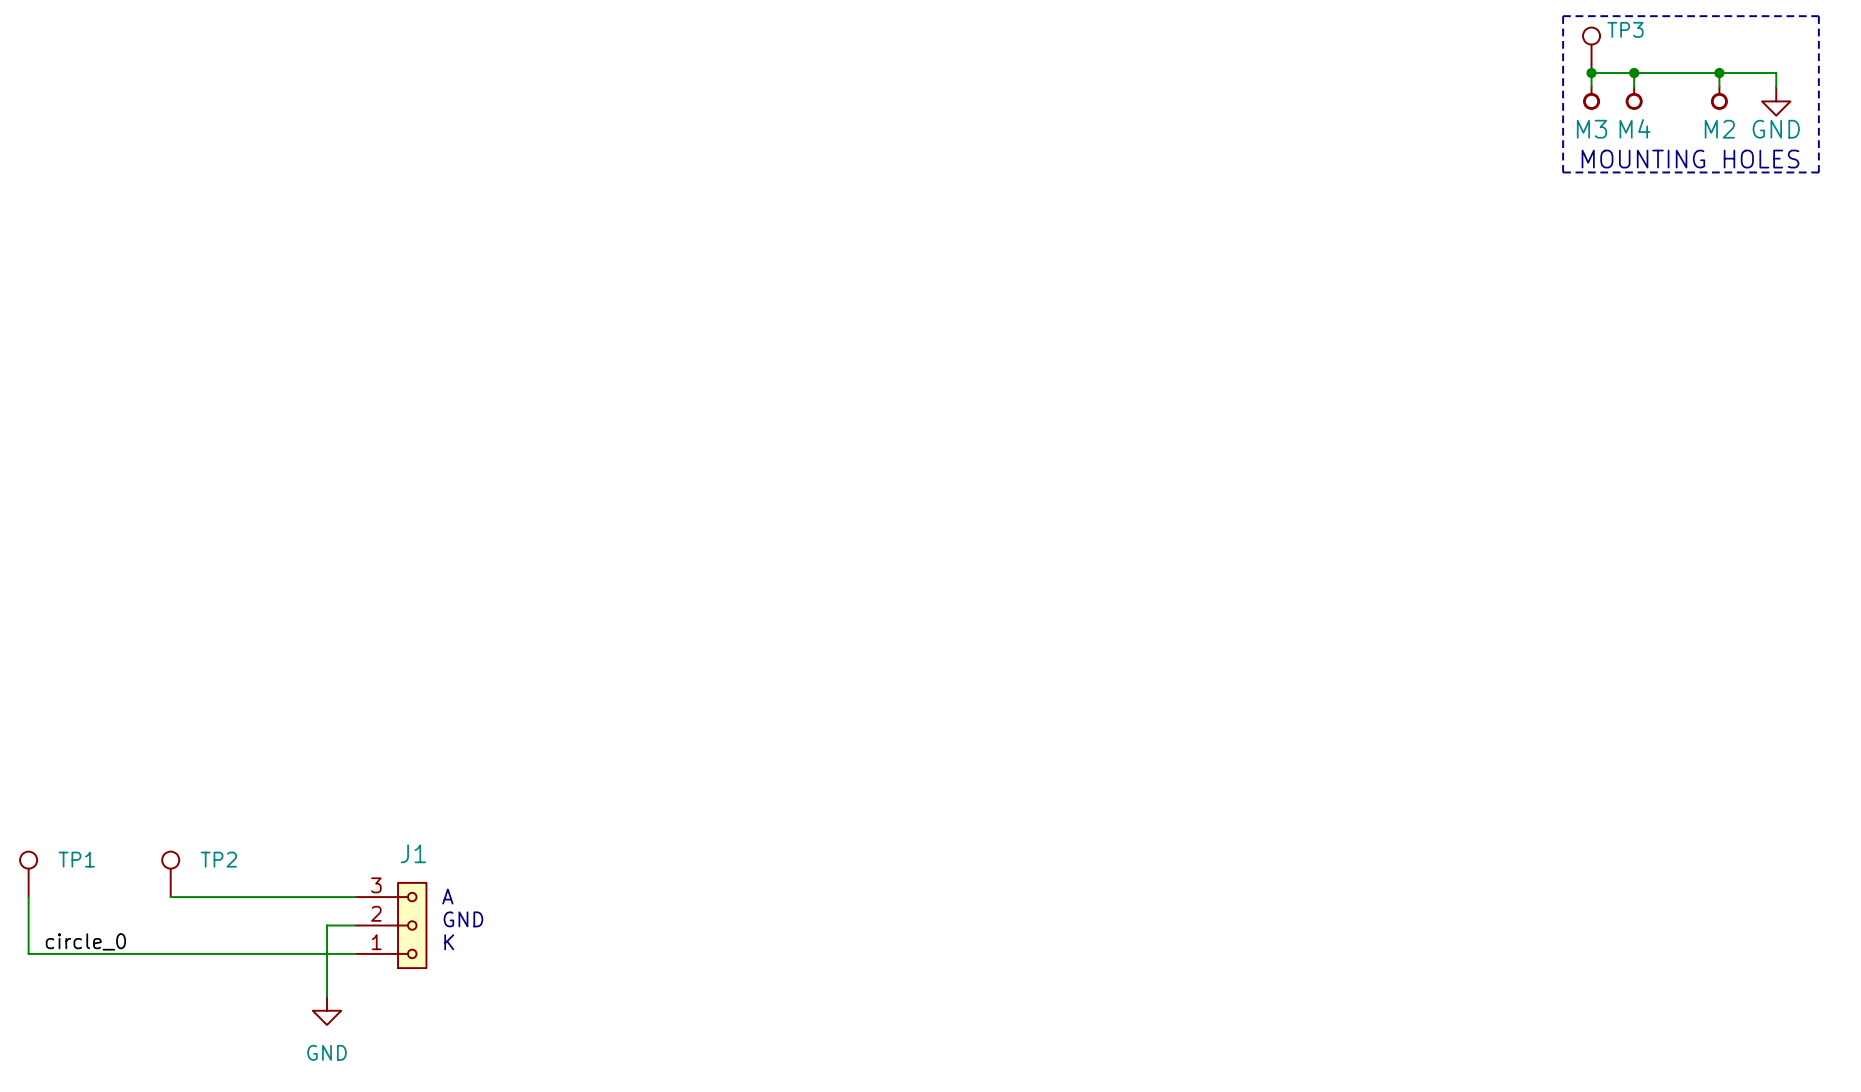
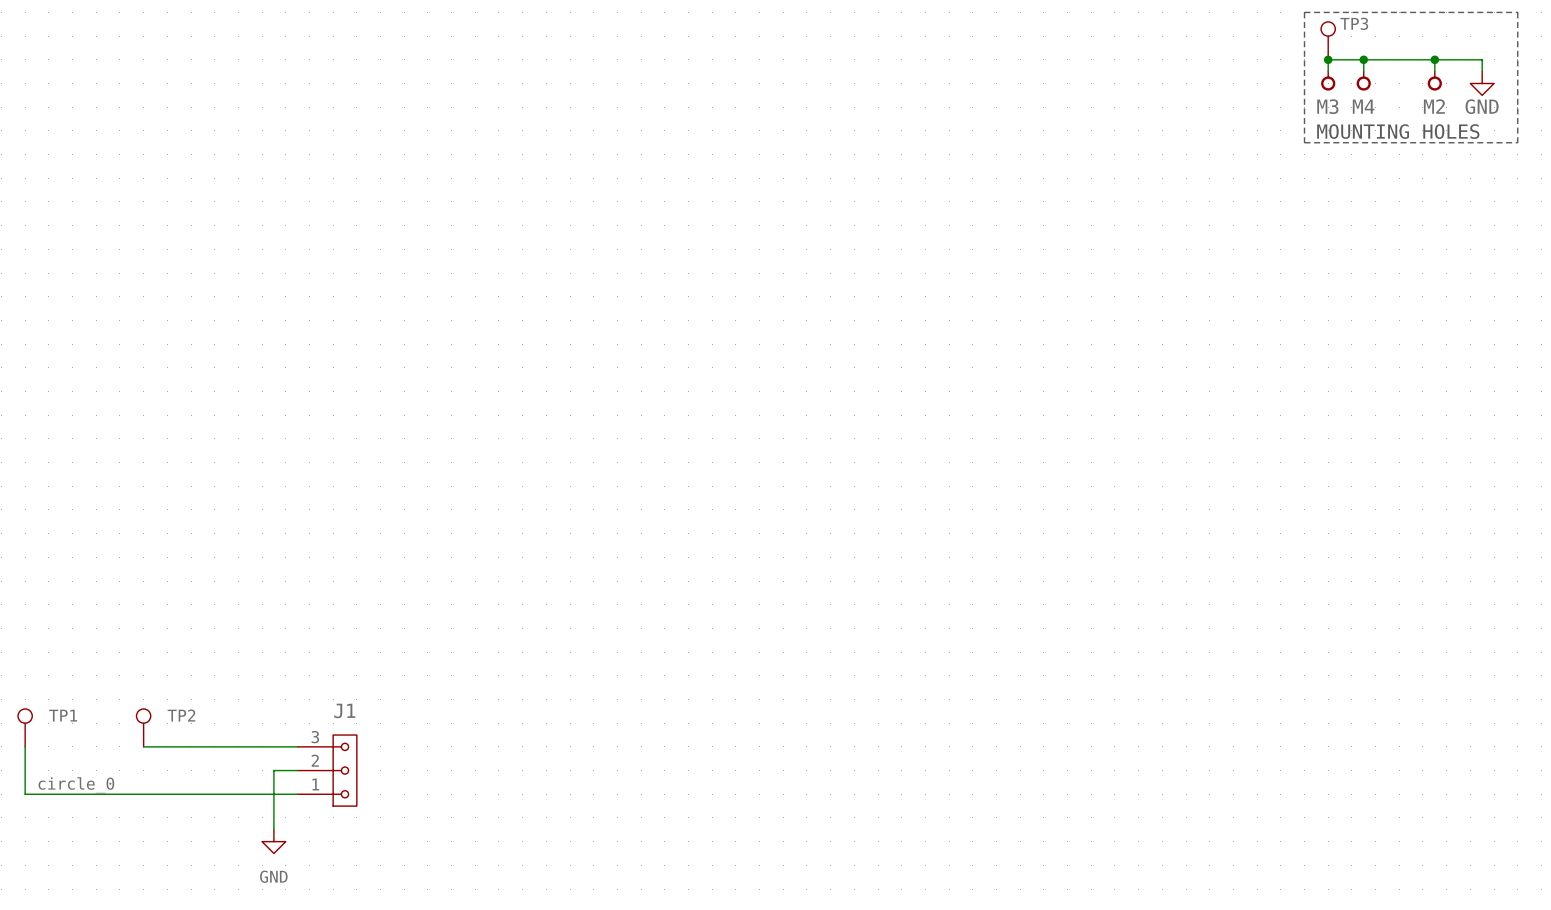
text: A (447, 896) -> none
text: GND (463, 919) -> none
text: K (449, 942) -> none

